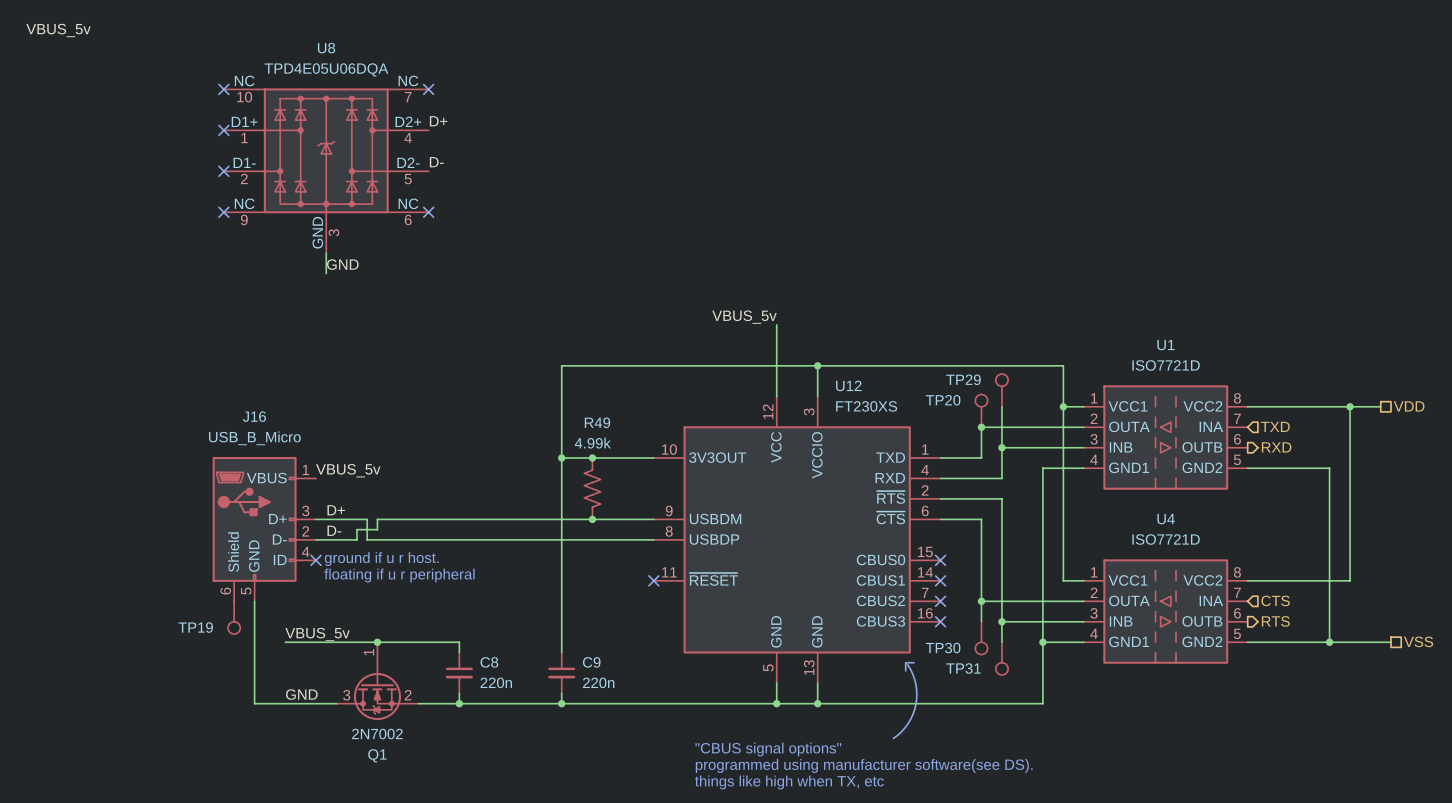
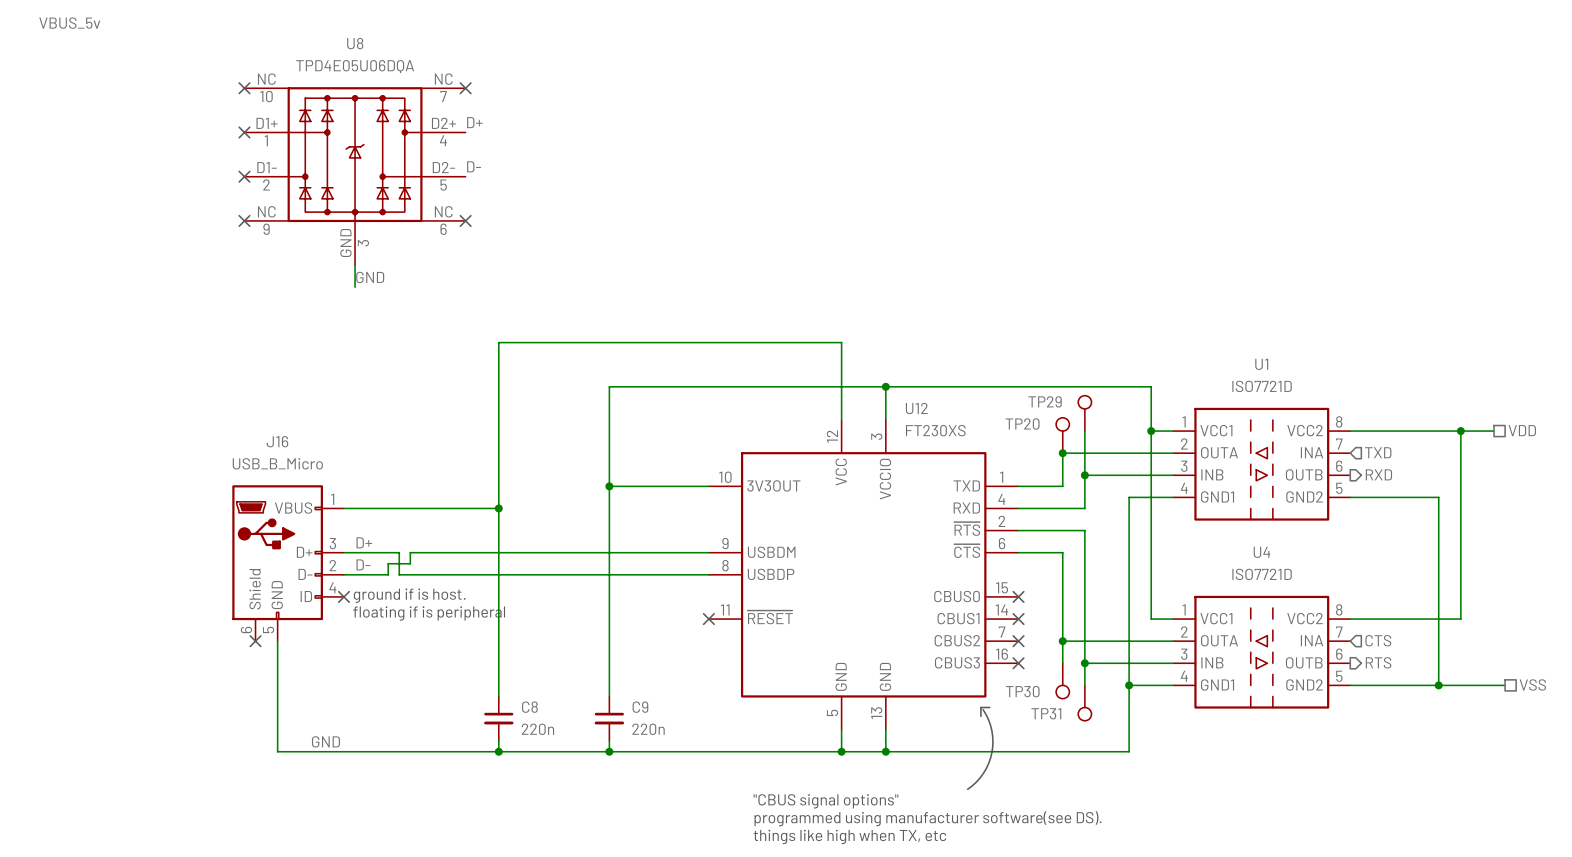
label: VBUS_5v (744, 317) -> none
junction: (592, 457) -> none
label: VBUS_5v (348, 470) -> none
wire: none -> (343, 508) (498, 508)
junction: none -> (498, 508)
R49: 4.99k (592, 488) -> none
junction: (592, 519) -> none
text: ground if u r host. (381, 559) -> ground if is host. (409, 595)
text: floating if u r peripheral (399, 575) -> floating if is peripheral (429, 613)
no-connect mark: none -> (255, 641)
TP19: (234, 617) -> none
label: VBUS_5v (317, 634) -> none
wire: (285, 642) (459, 642) -> (841, 342) (498, 342) (498, 685)
junction: (377, 642) -> none
Q1: 2N7002 (377, 681) -> none

